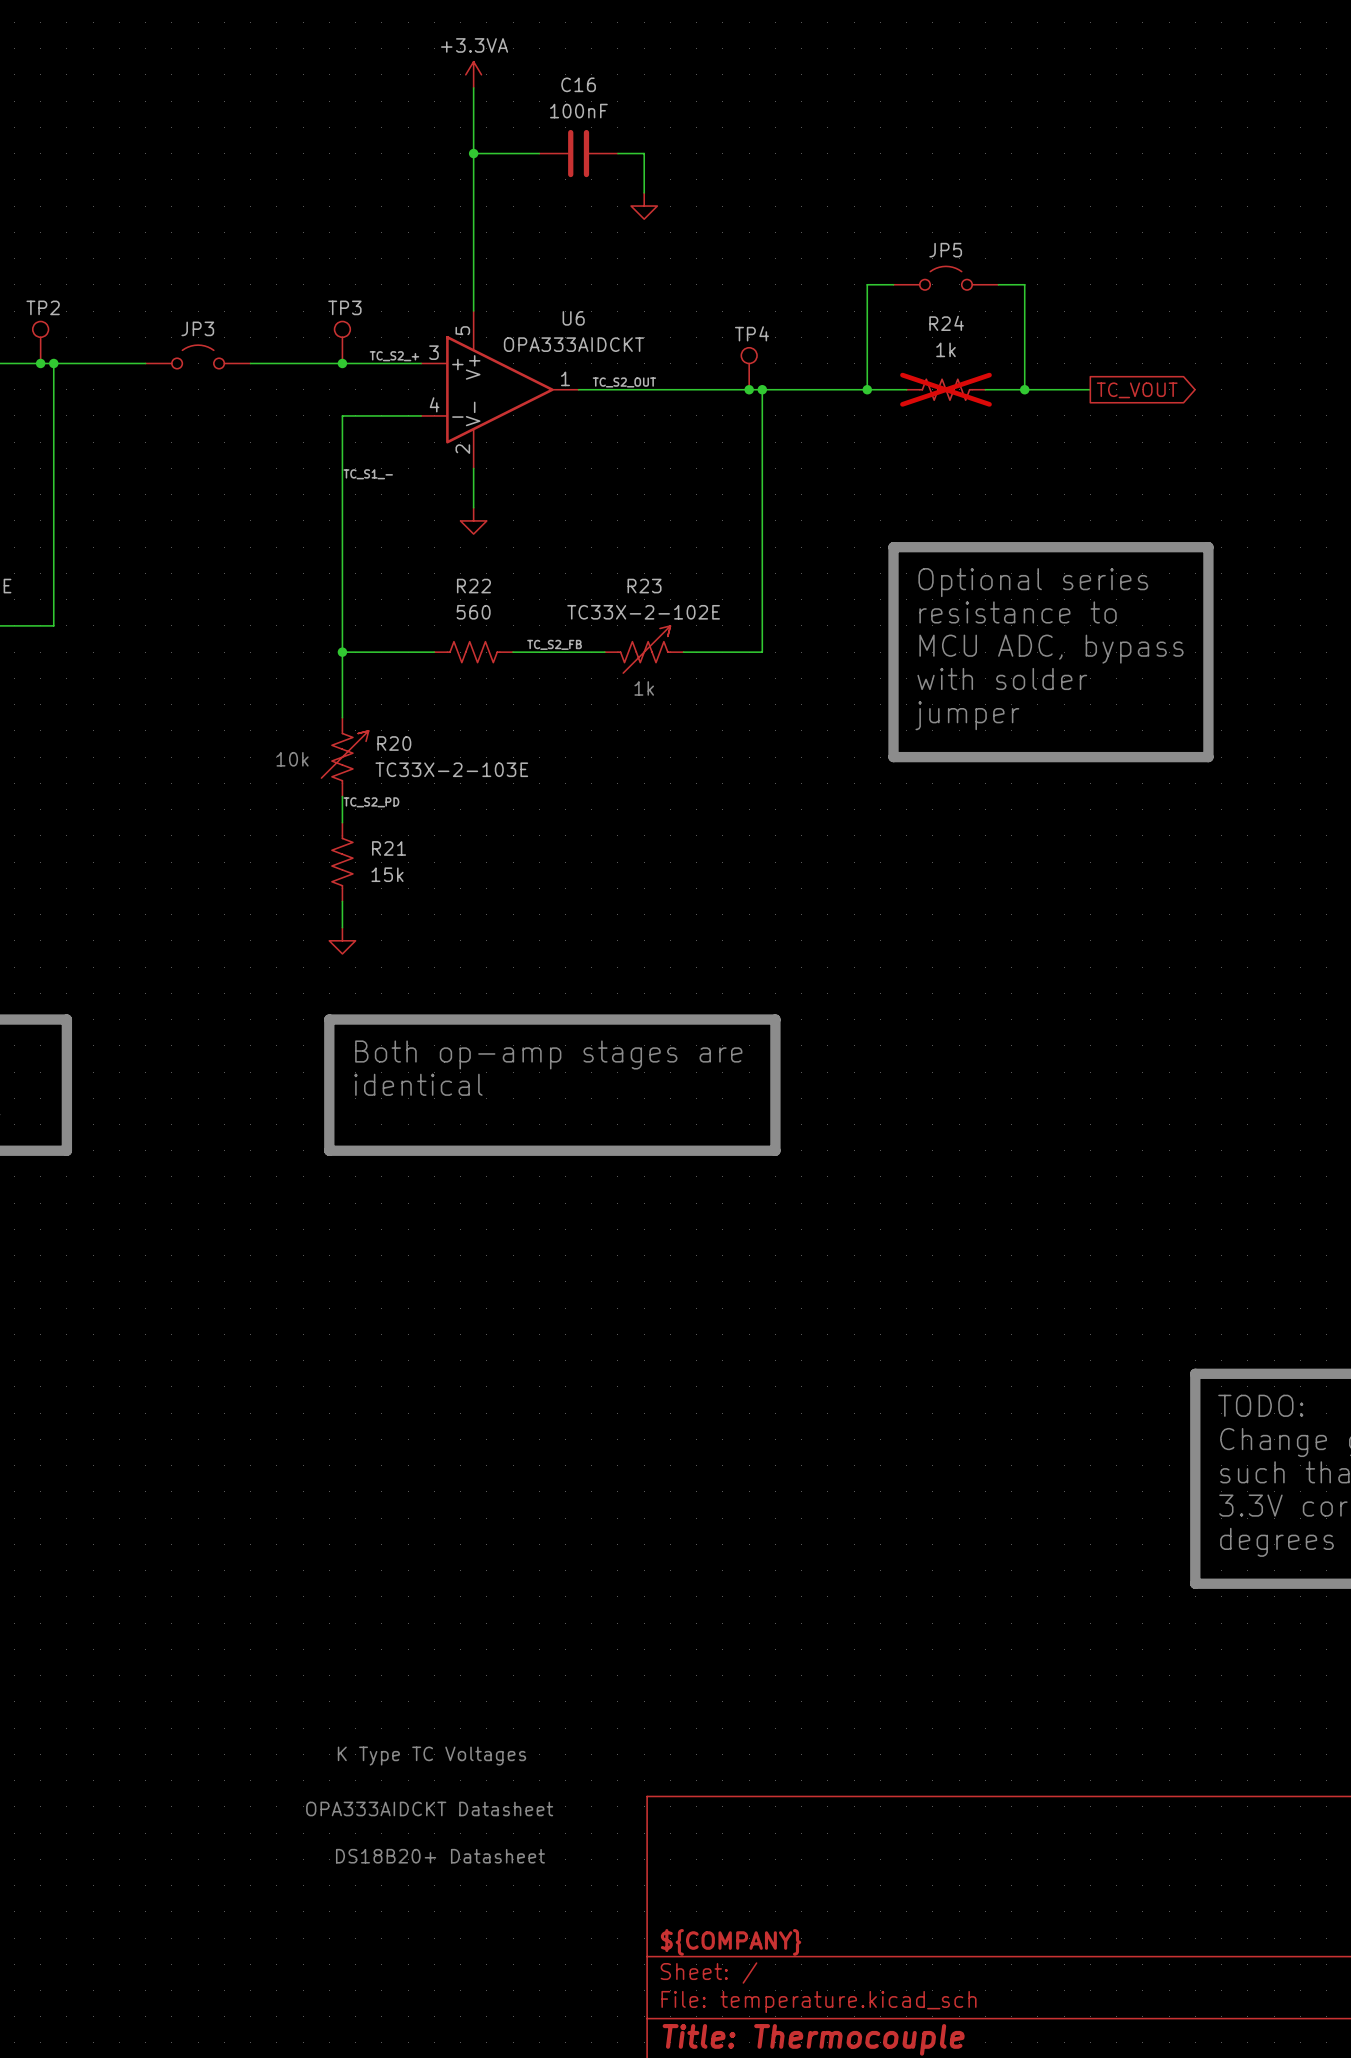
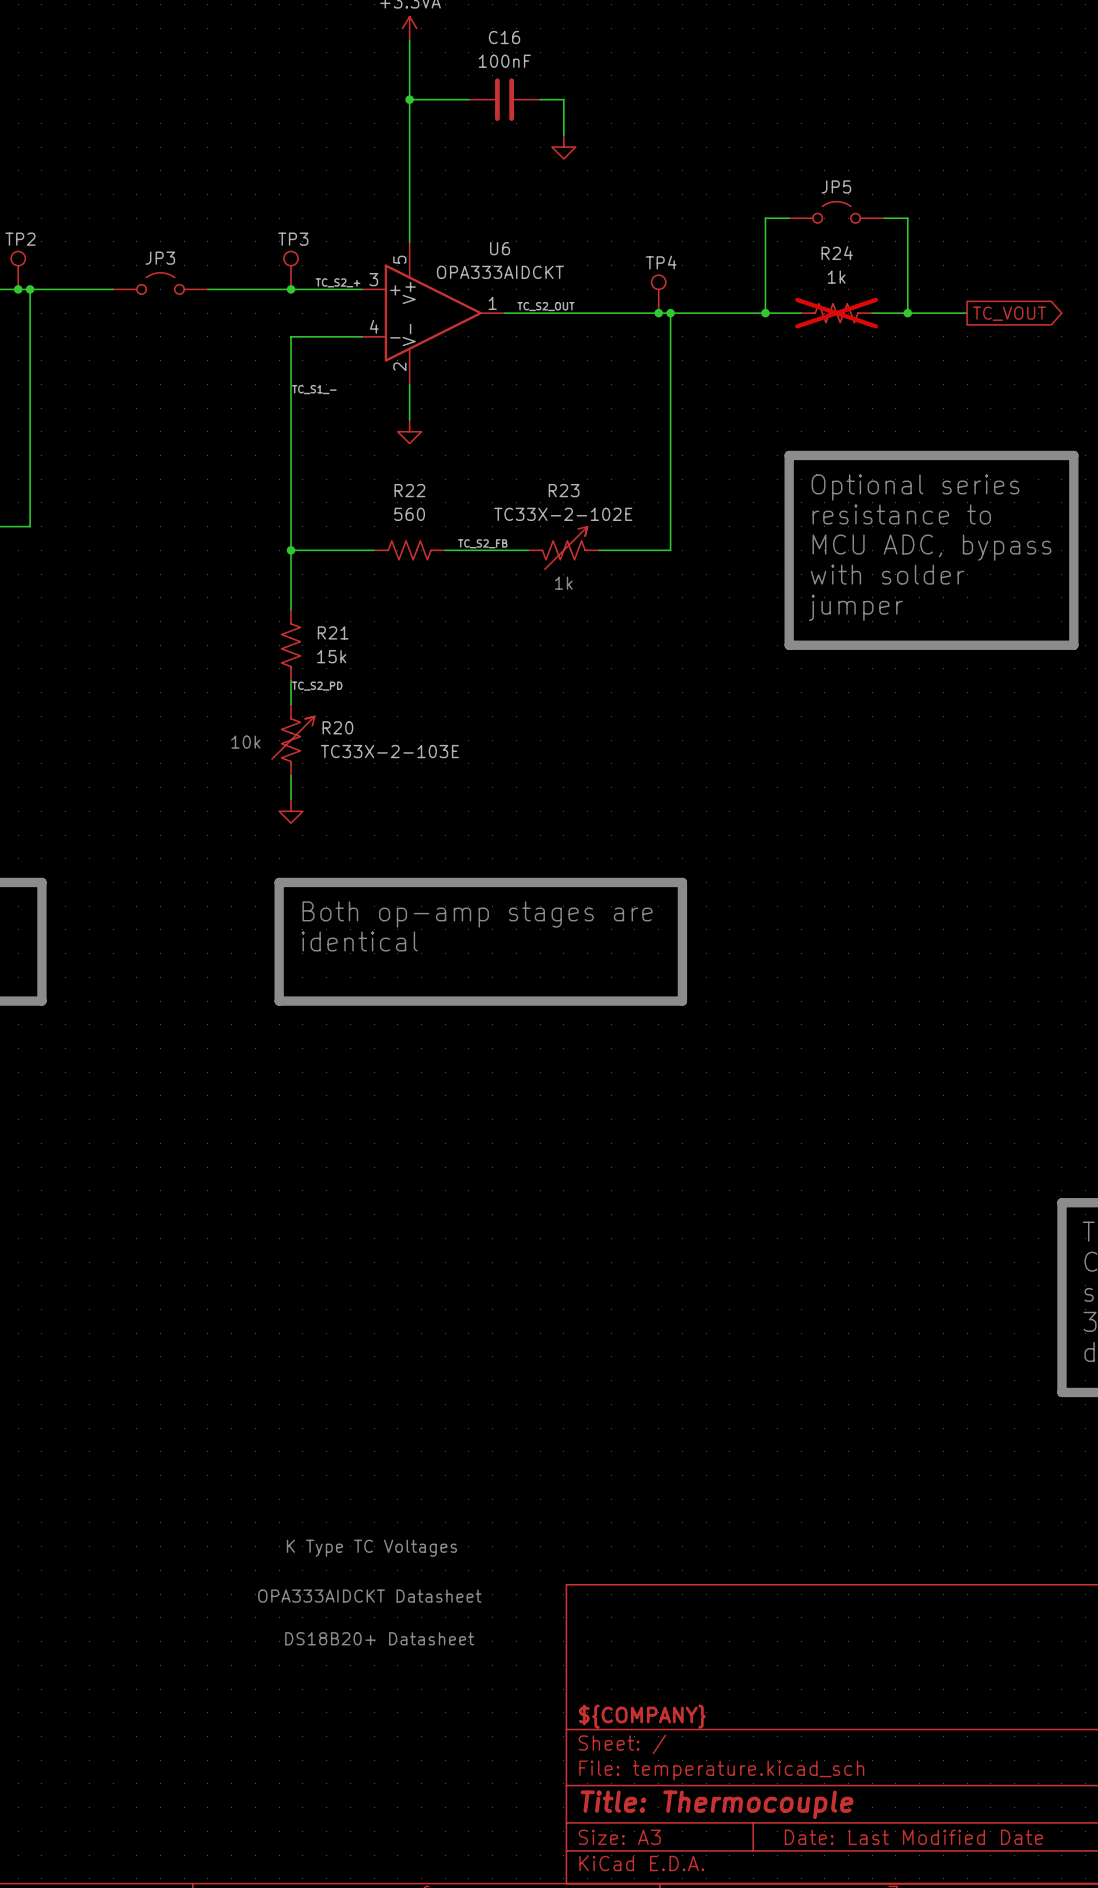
R20 position: (345, 757) -> (293, 740)
text position: 10k (292, 759) -> 10k (245, 742)
R21 position: (342, 862) -> (291, 645)

